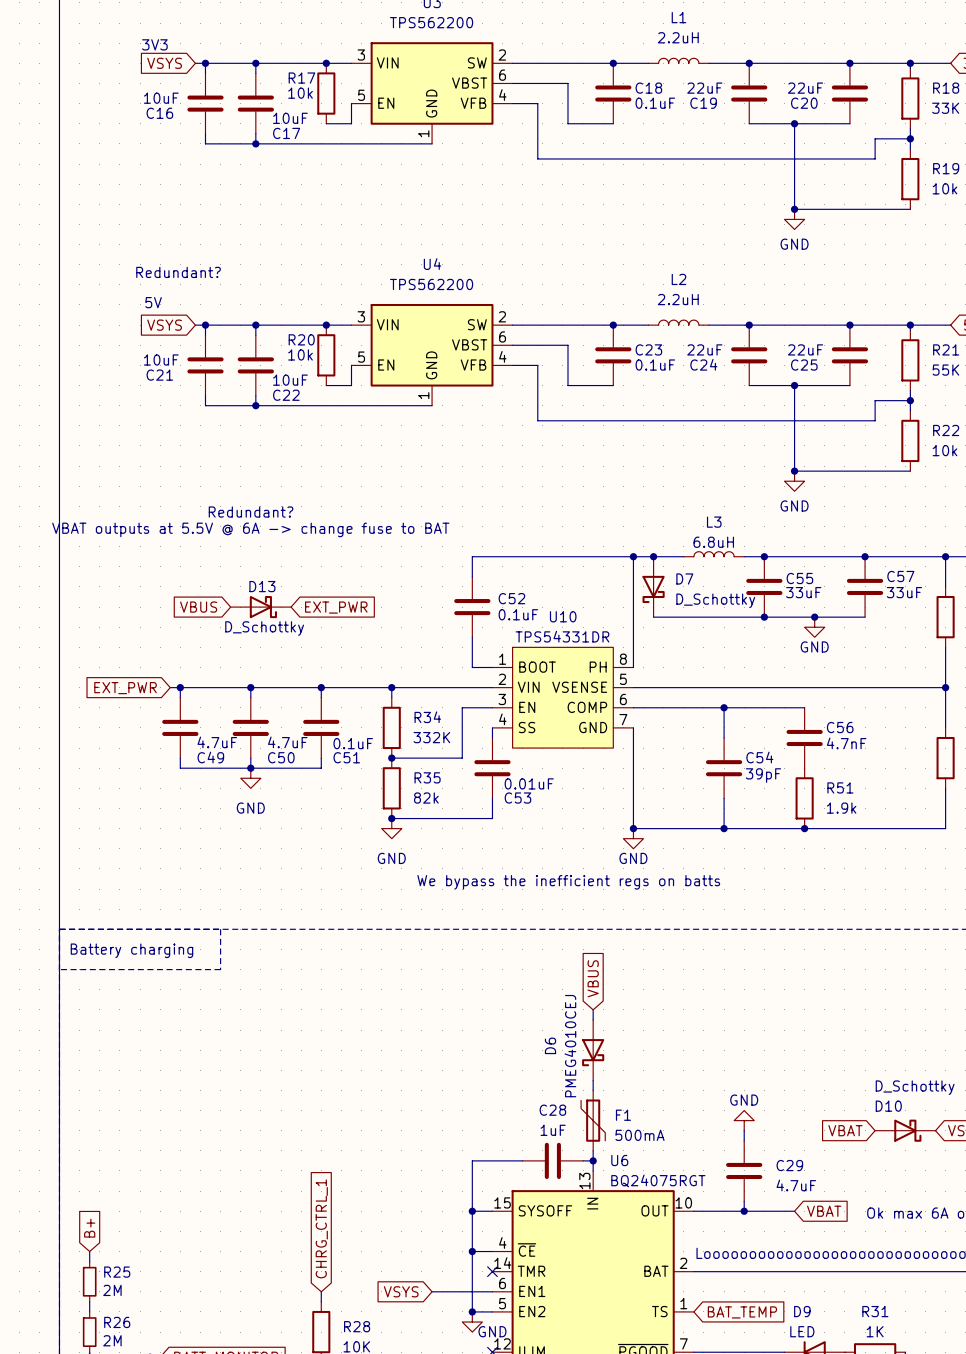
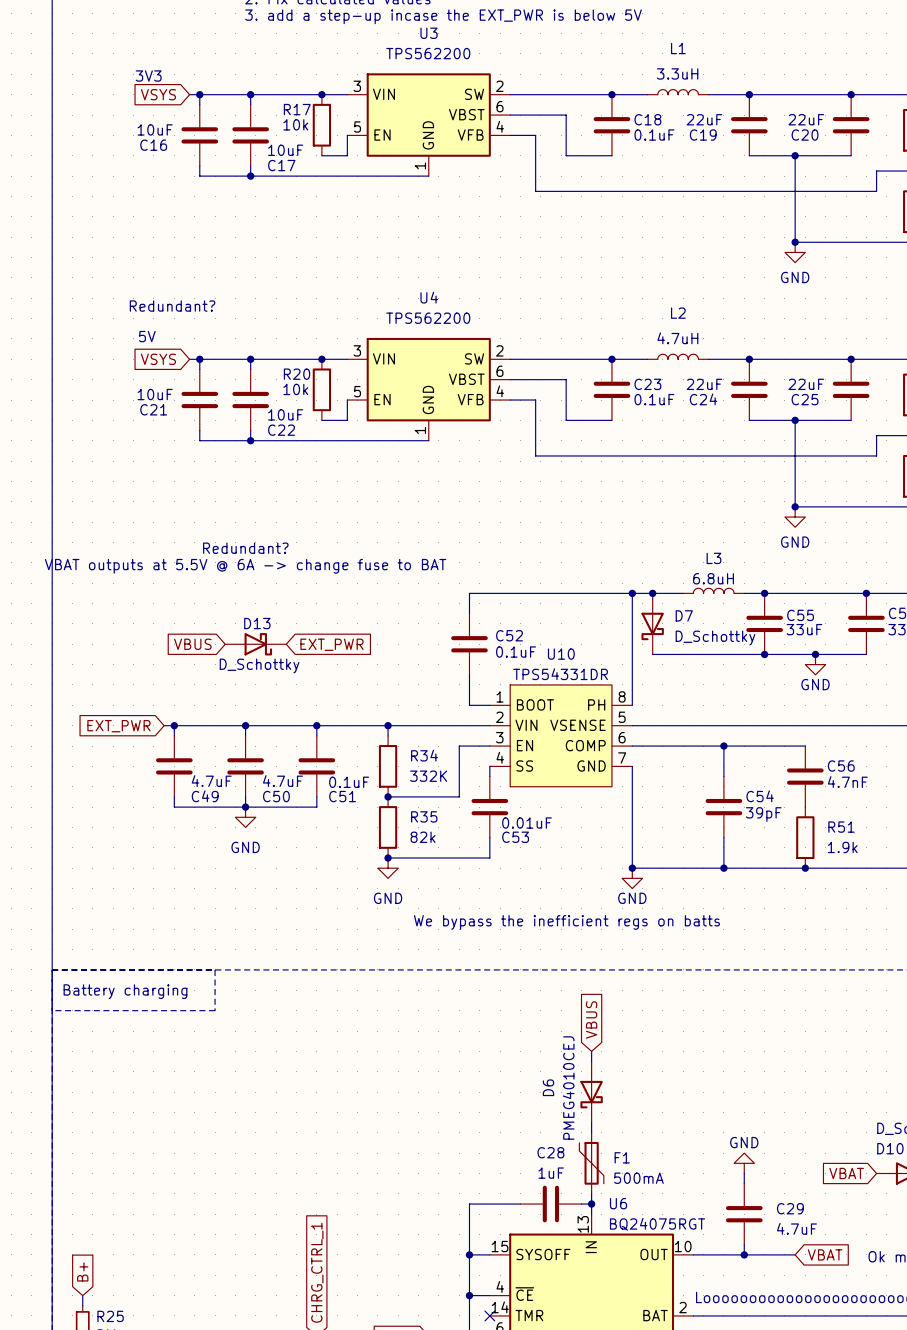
L1 value: 2.2uH (678, 37) -> 3.3uH (677, 73)
L2 value: 2.2uH (678, 299) -> 4.7uH (677, 338)

